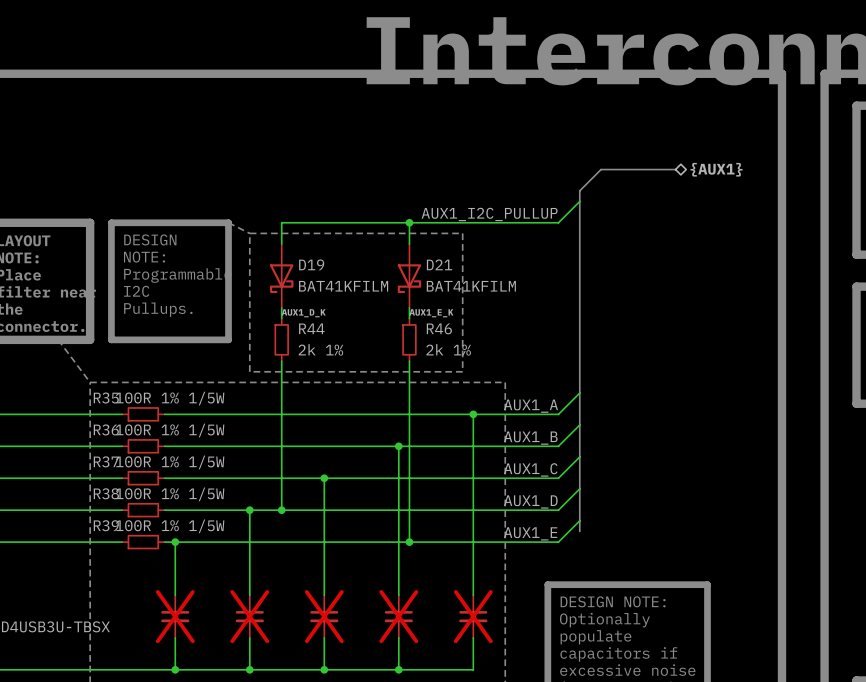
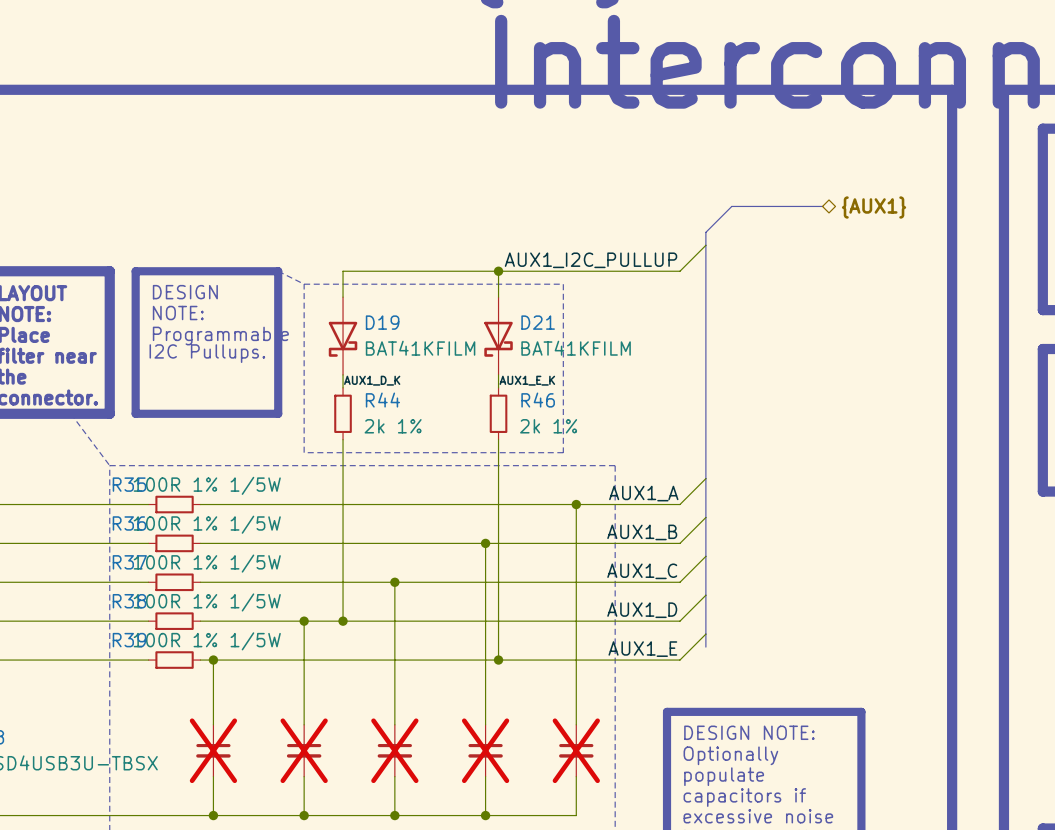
text: I2C (136, 291) -> I2C Pullups. (207, 353)
text: Pullups. (158, 309) -> none

